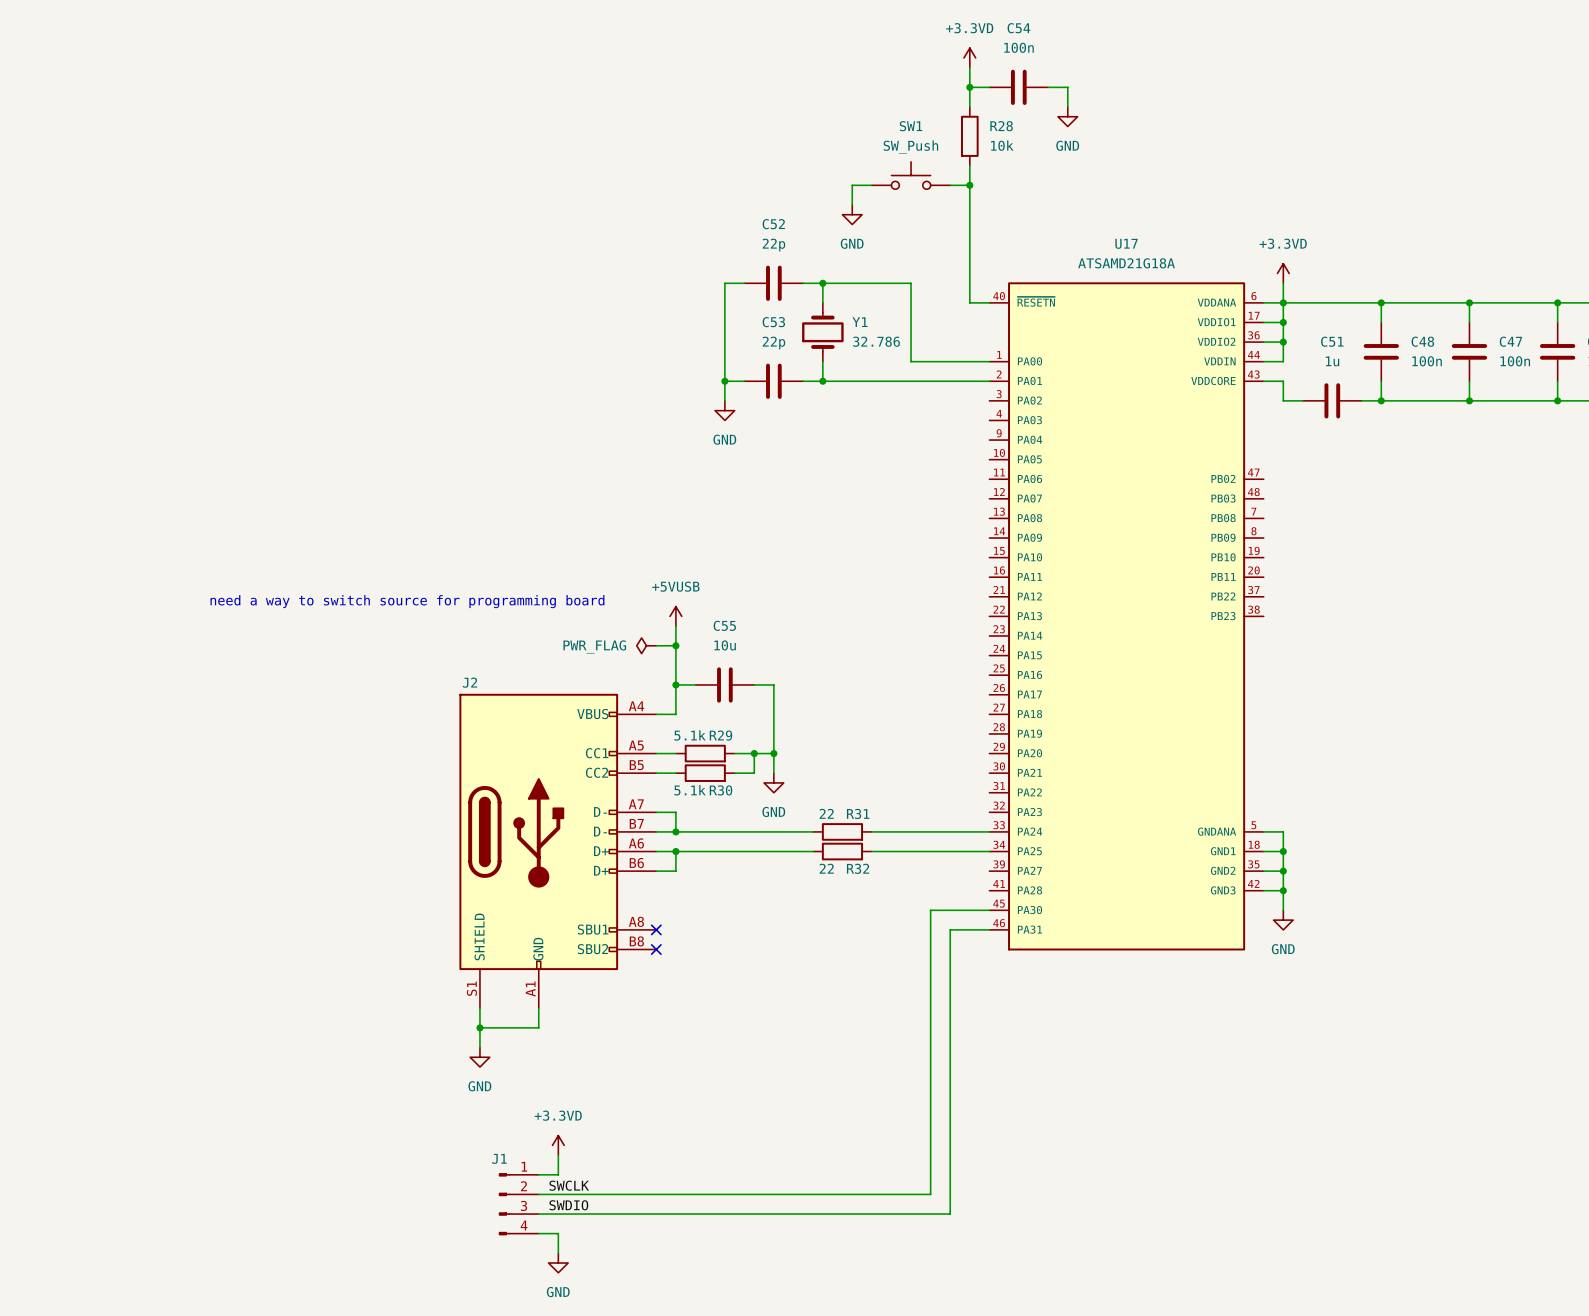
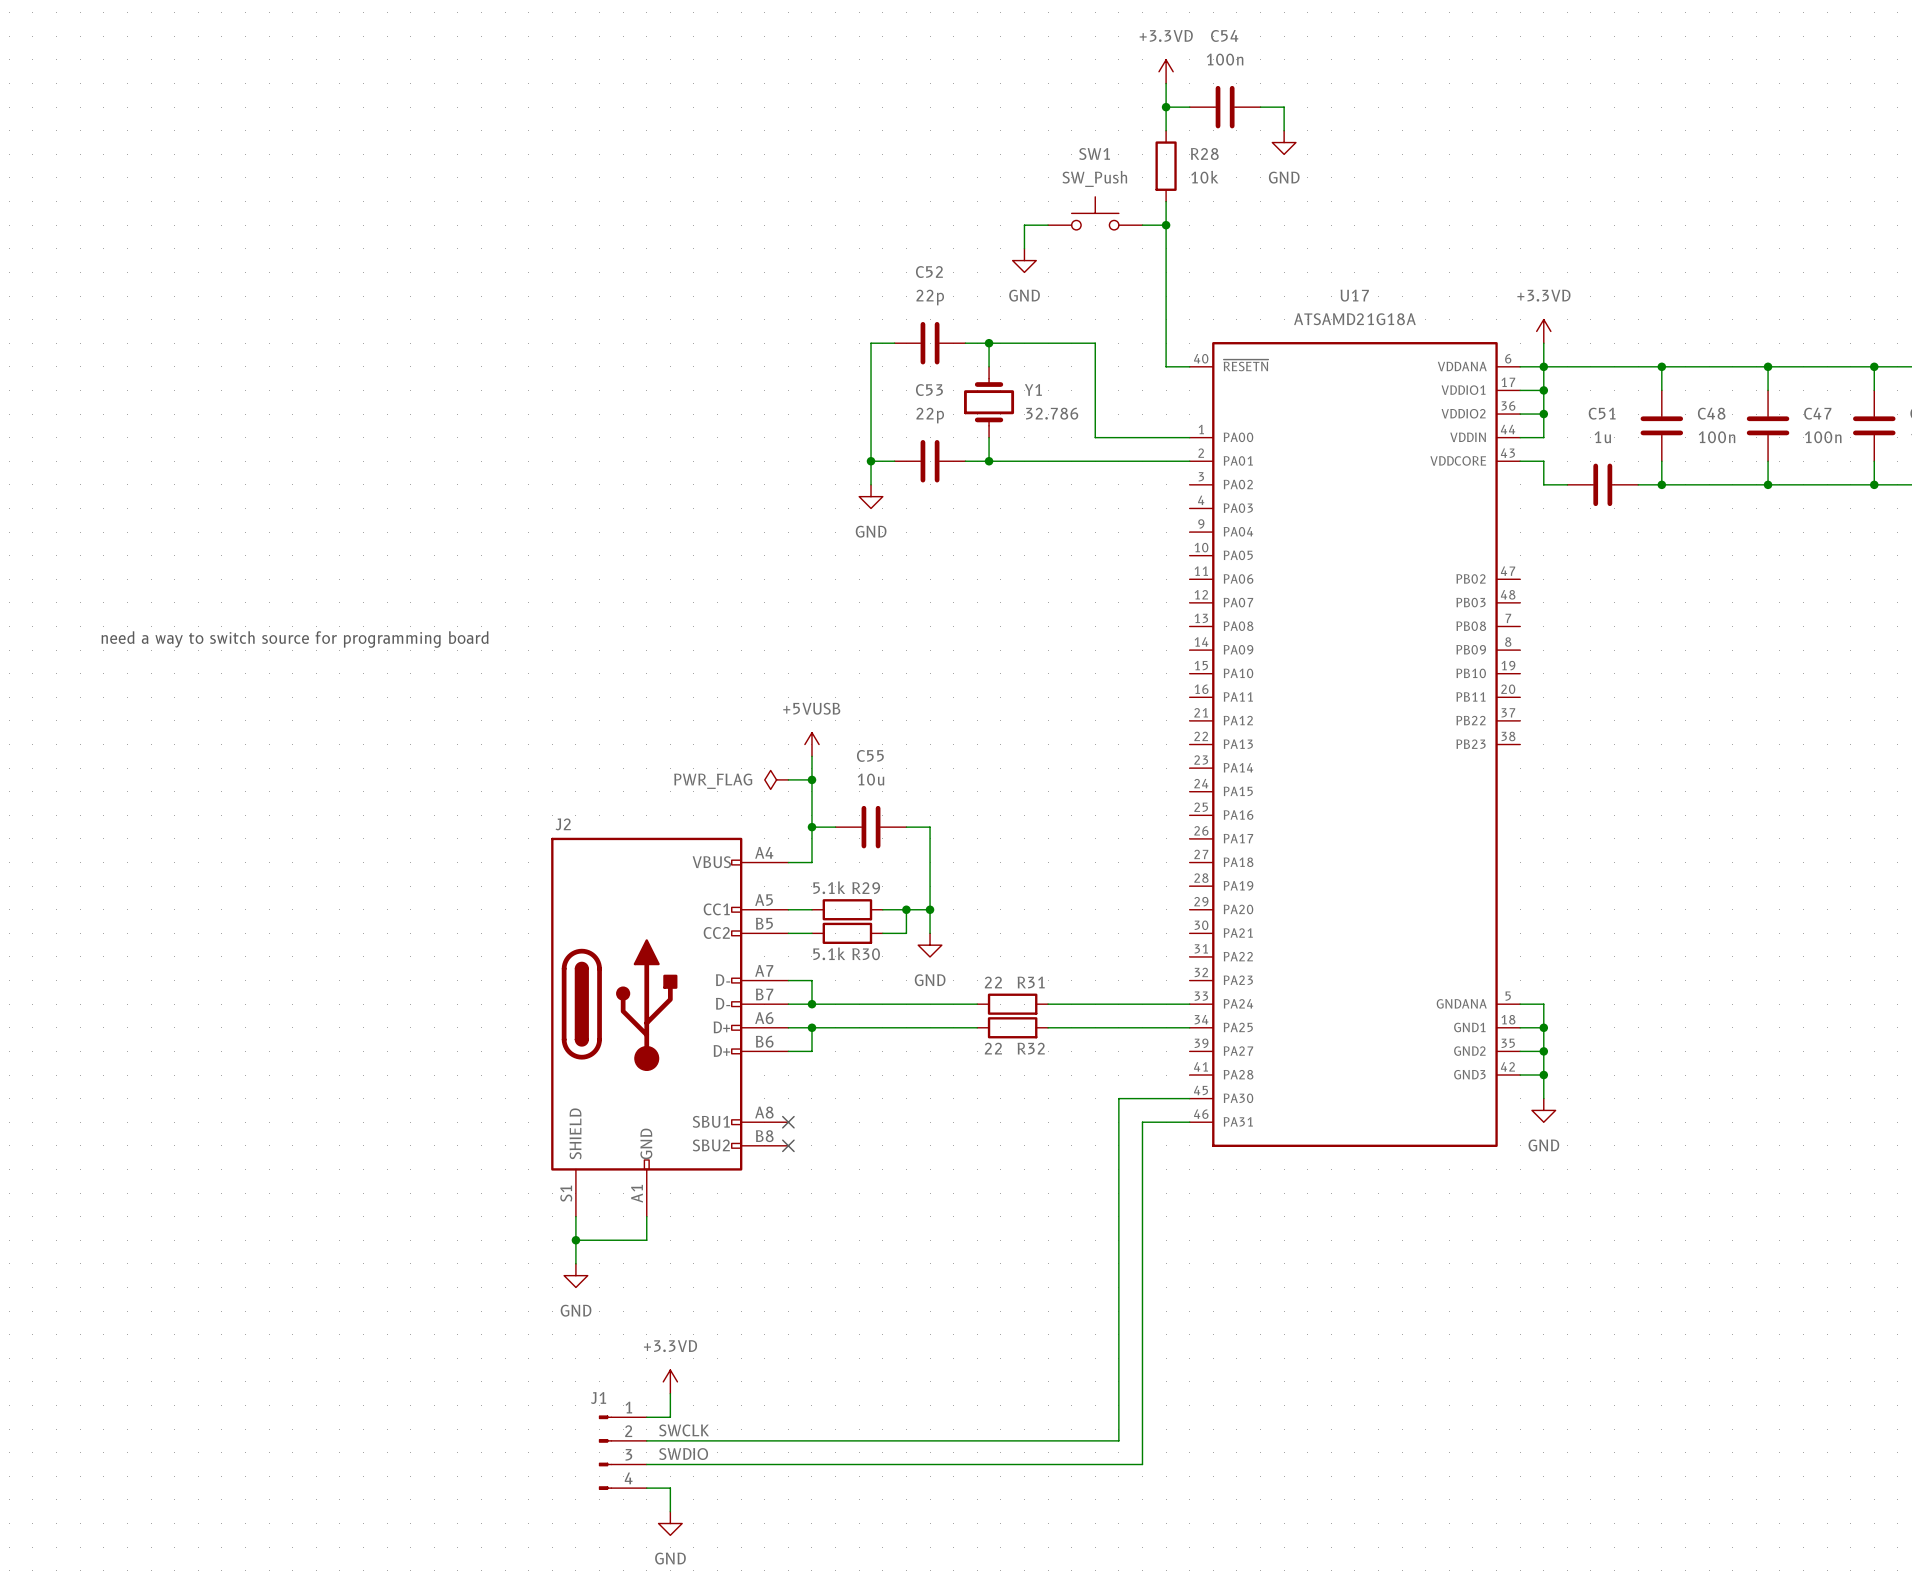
text position: need a way to switch source for programming board (407, 601) -> need a way to switch source for programming board (295, 639)

